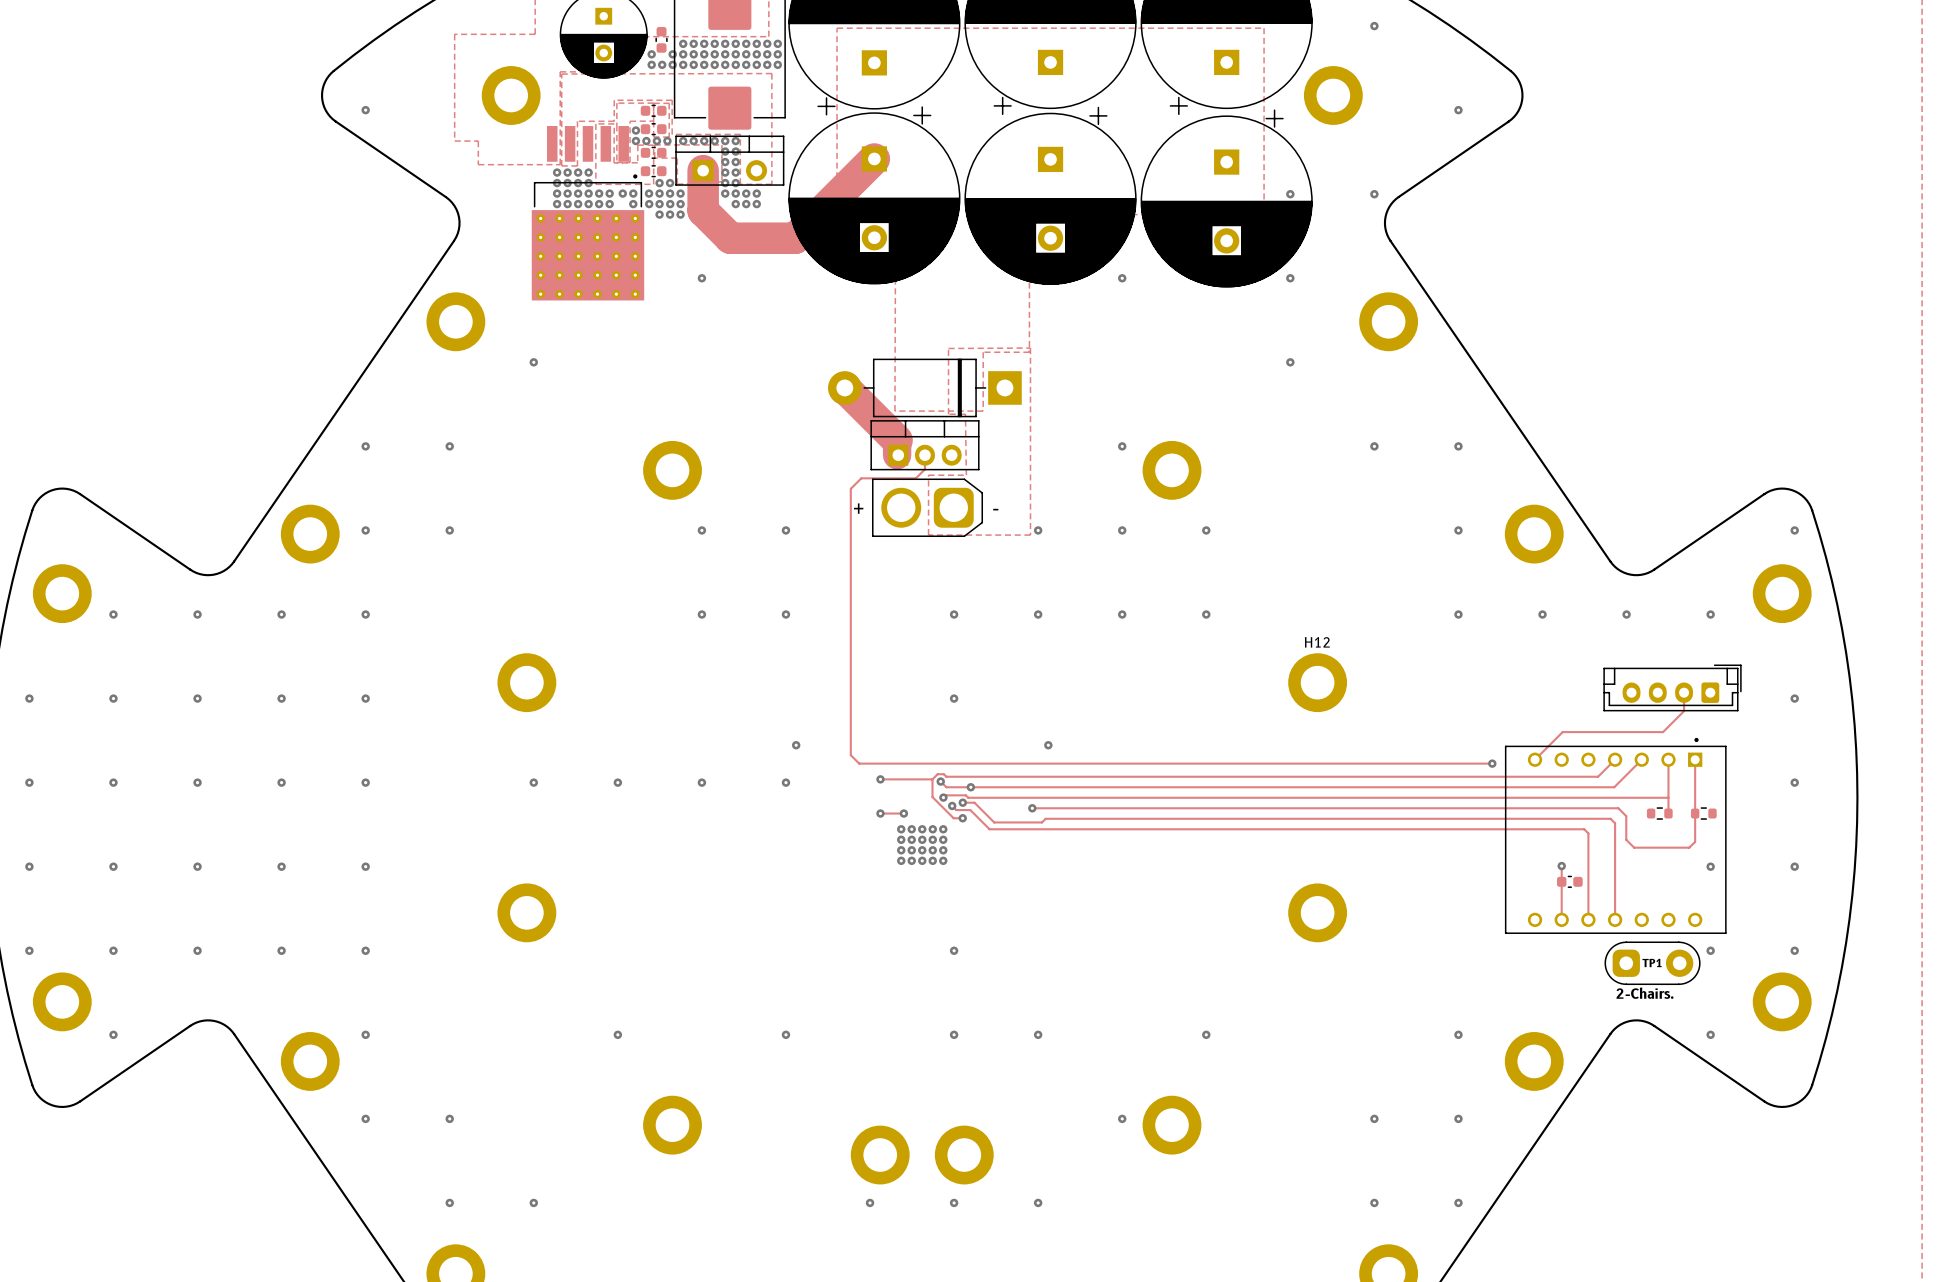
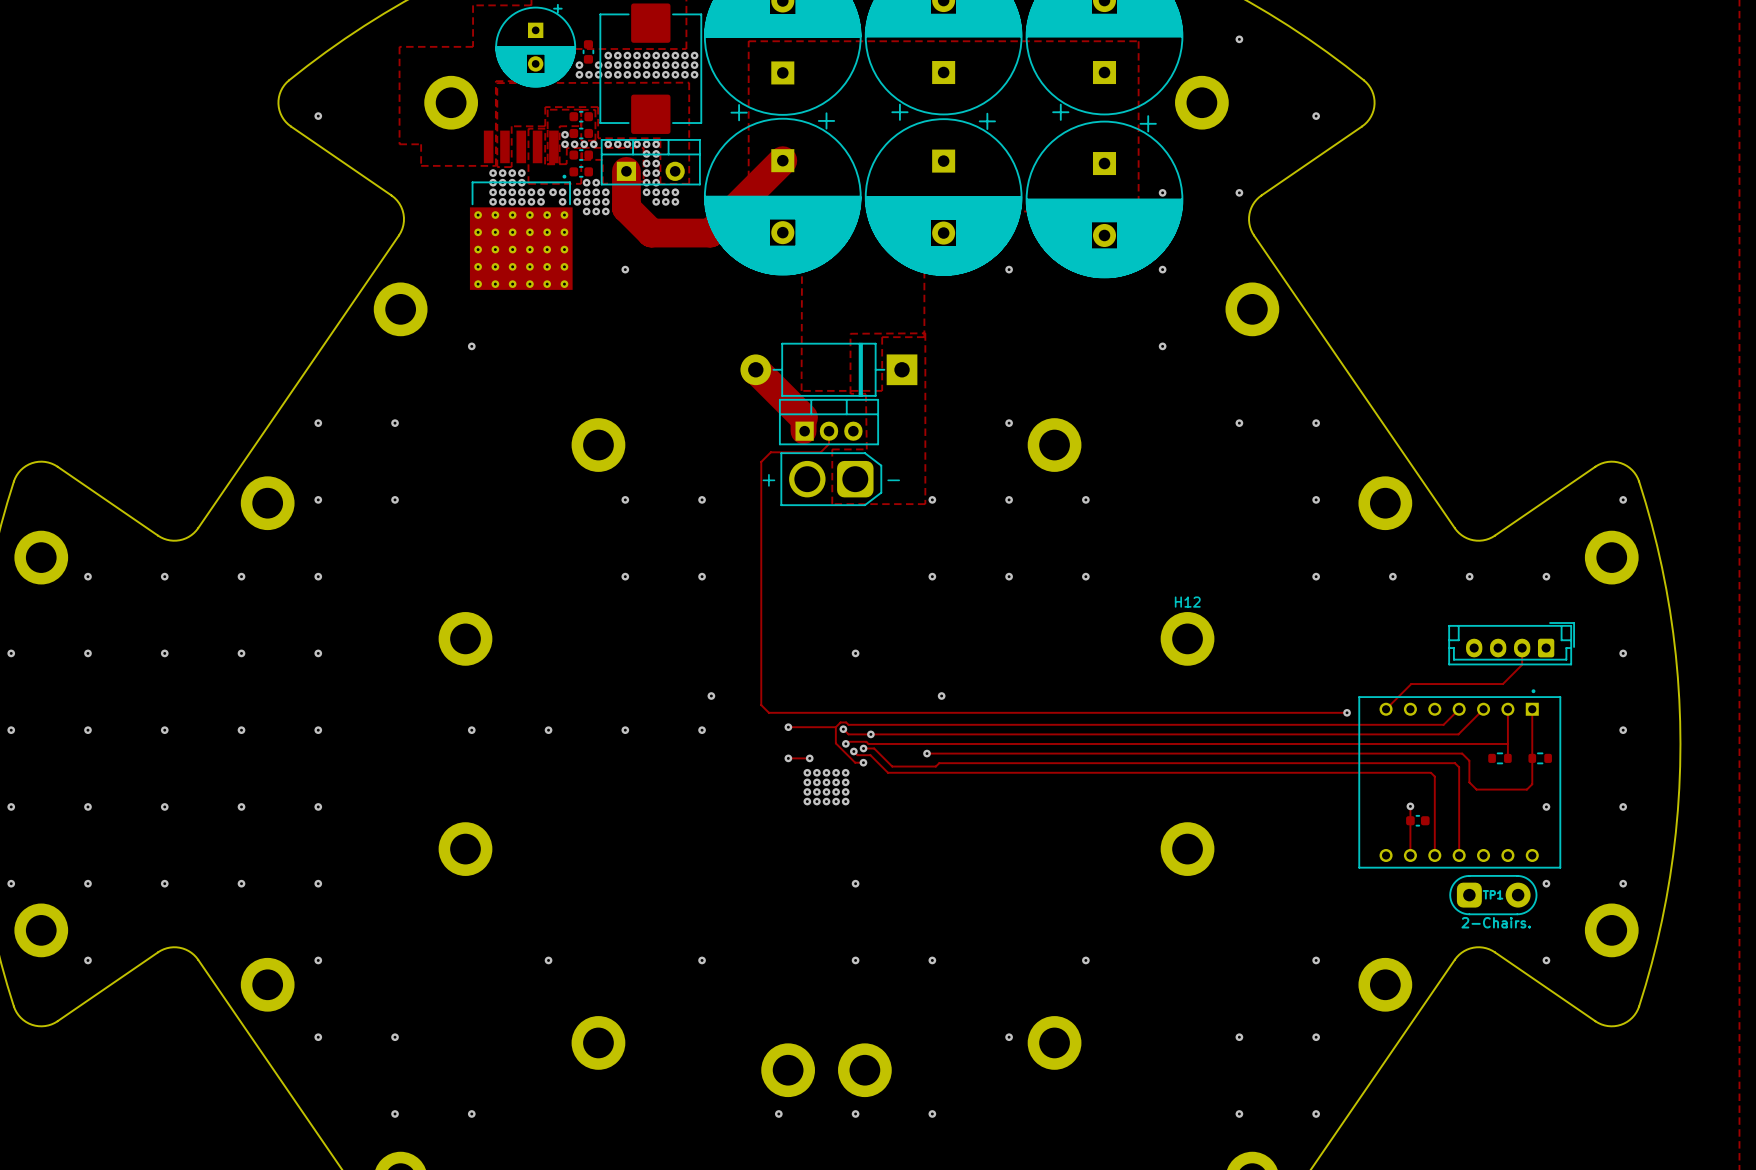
via: (954, 614) -> none

